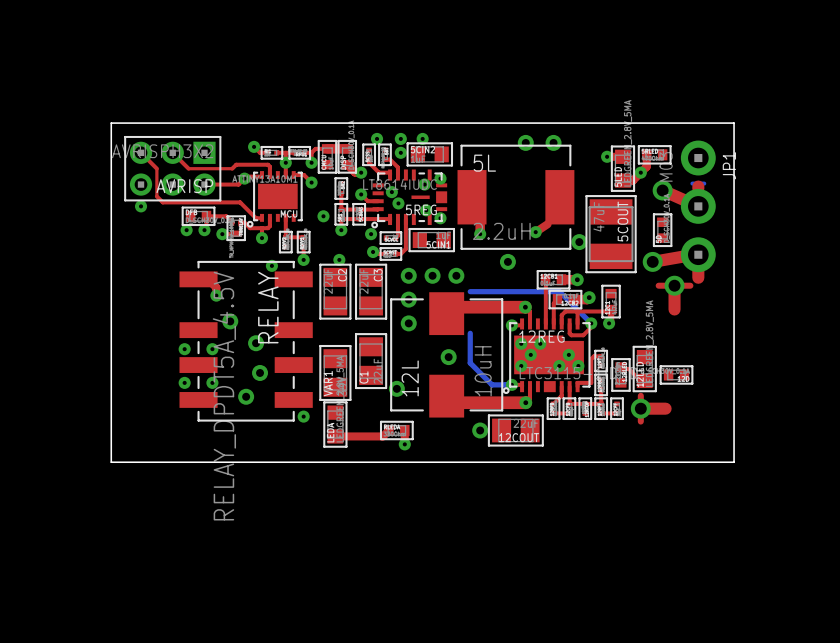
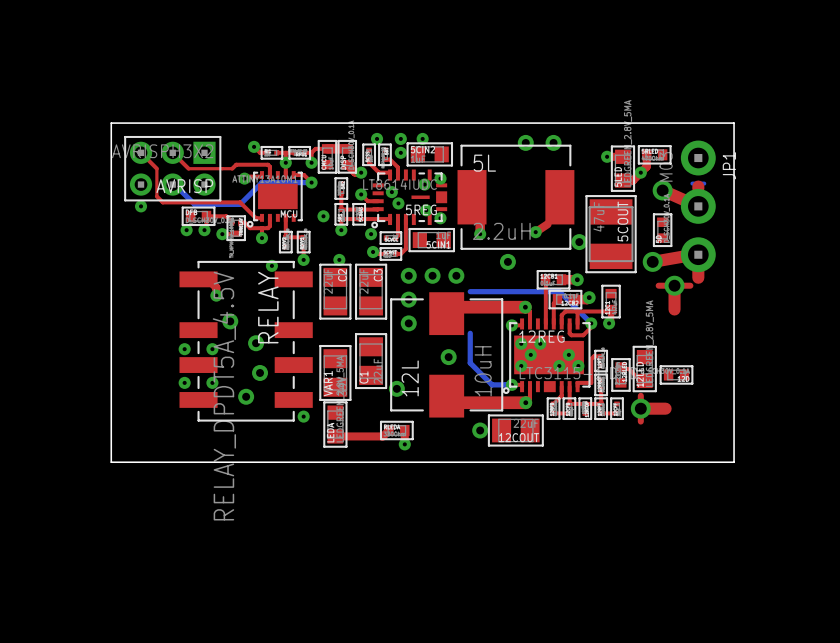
top track: (244, 178) (238, 184) (204, 184) -> none
bottom track: none -> (311, 182) (262, 182) (240, 204) (194, 204) (172, 184)

